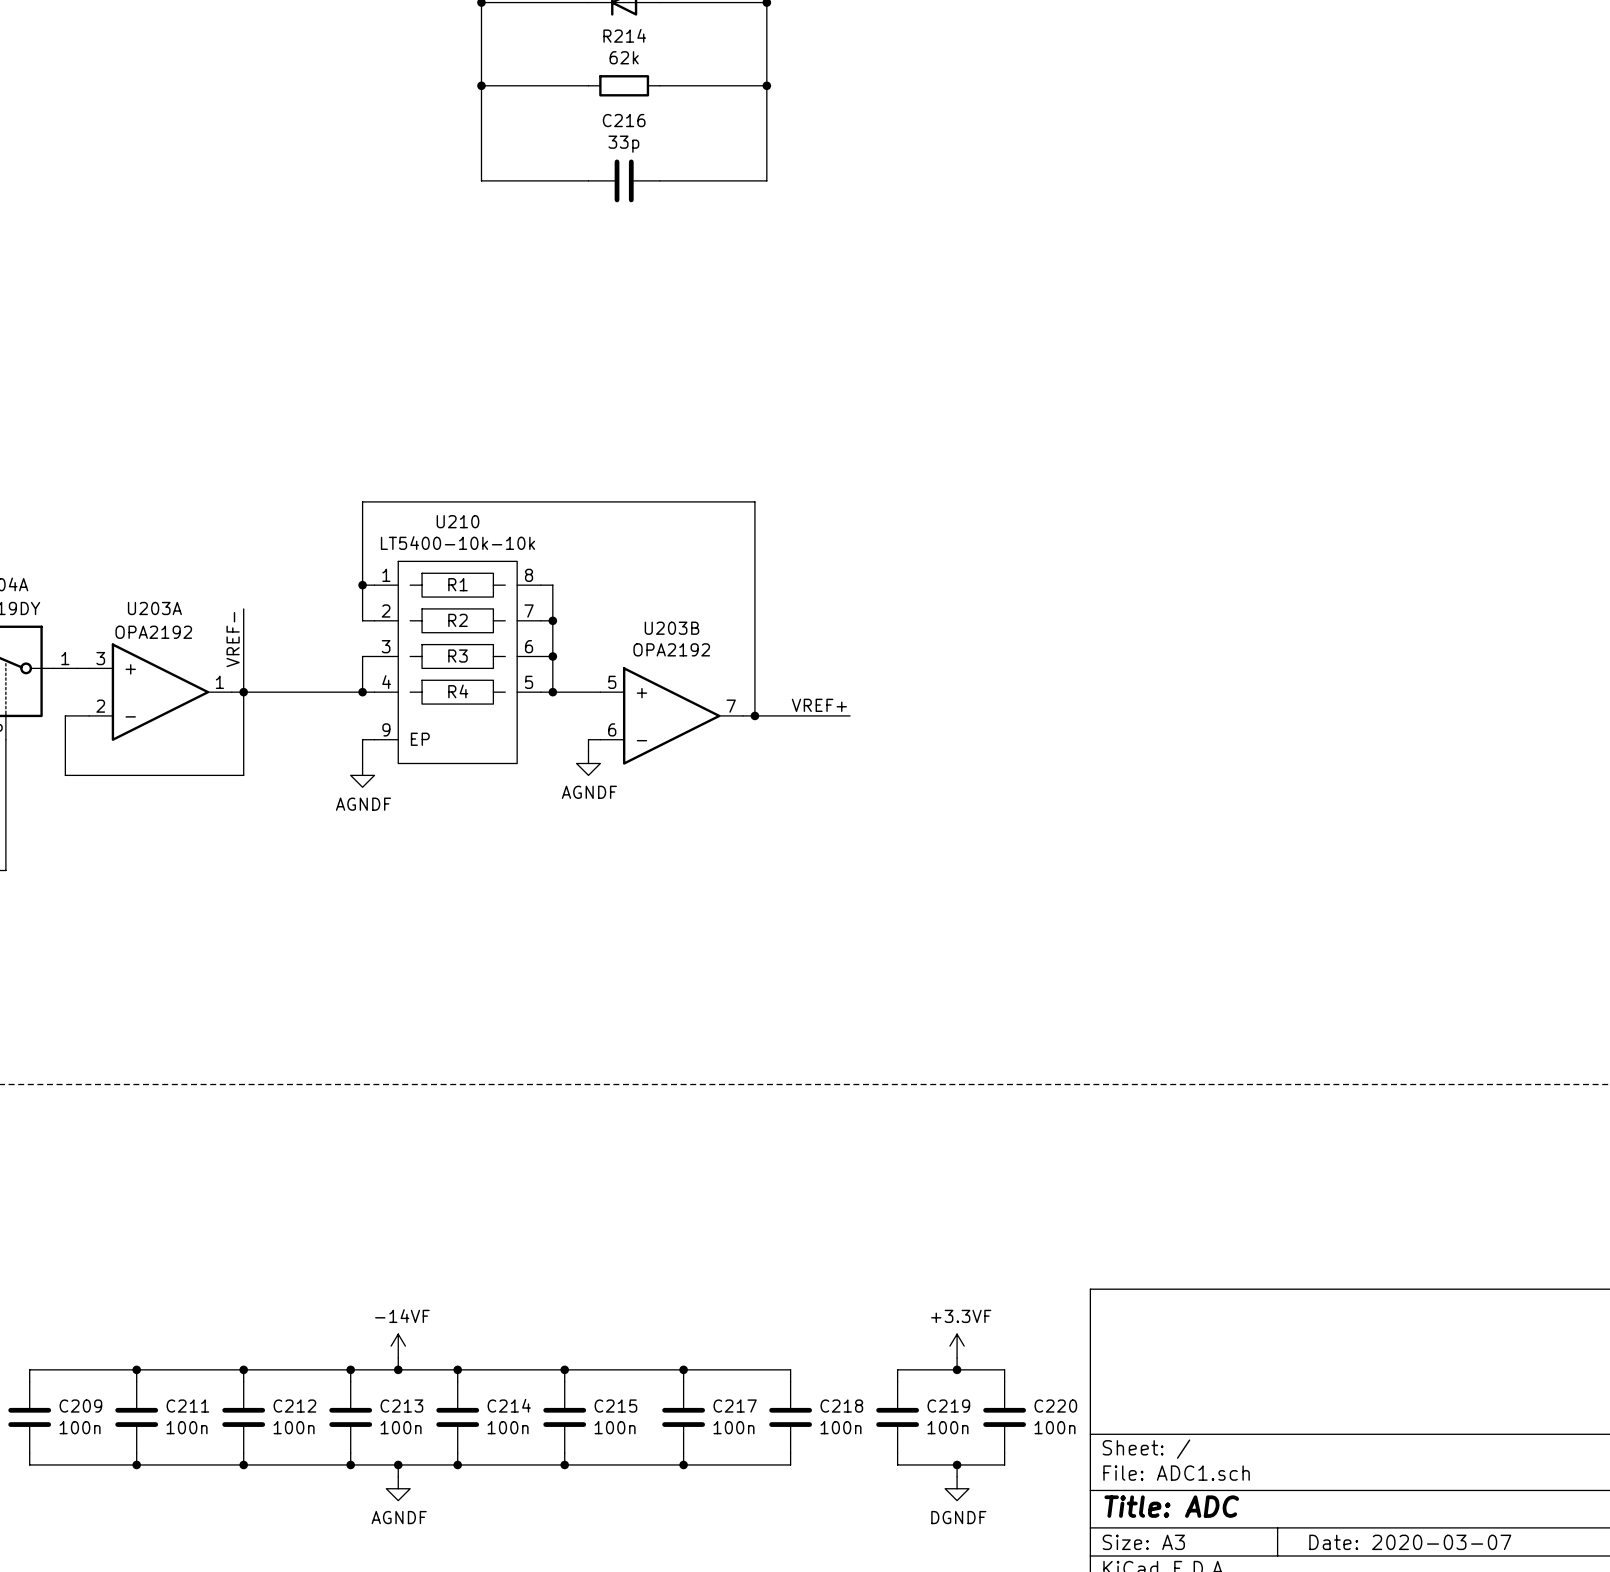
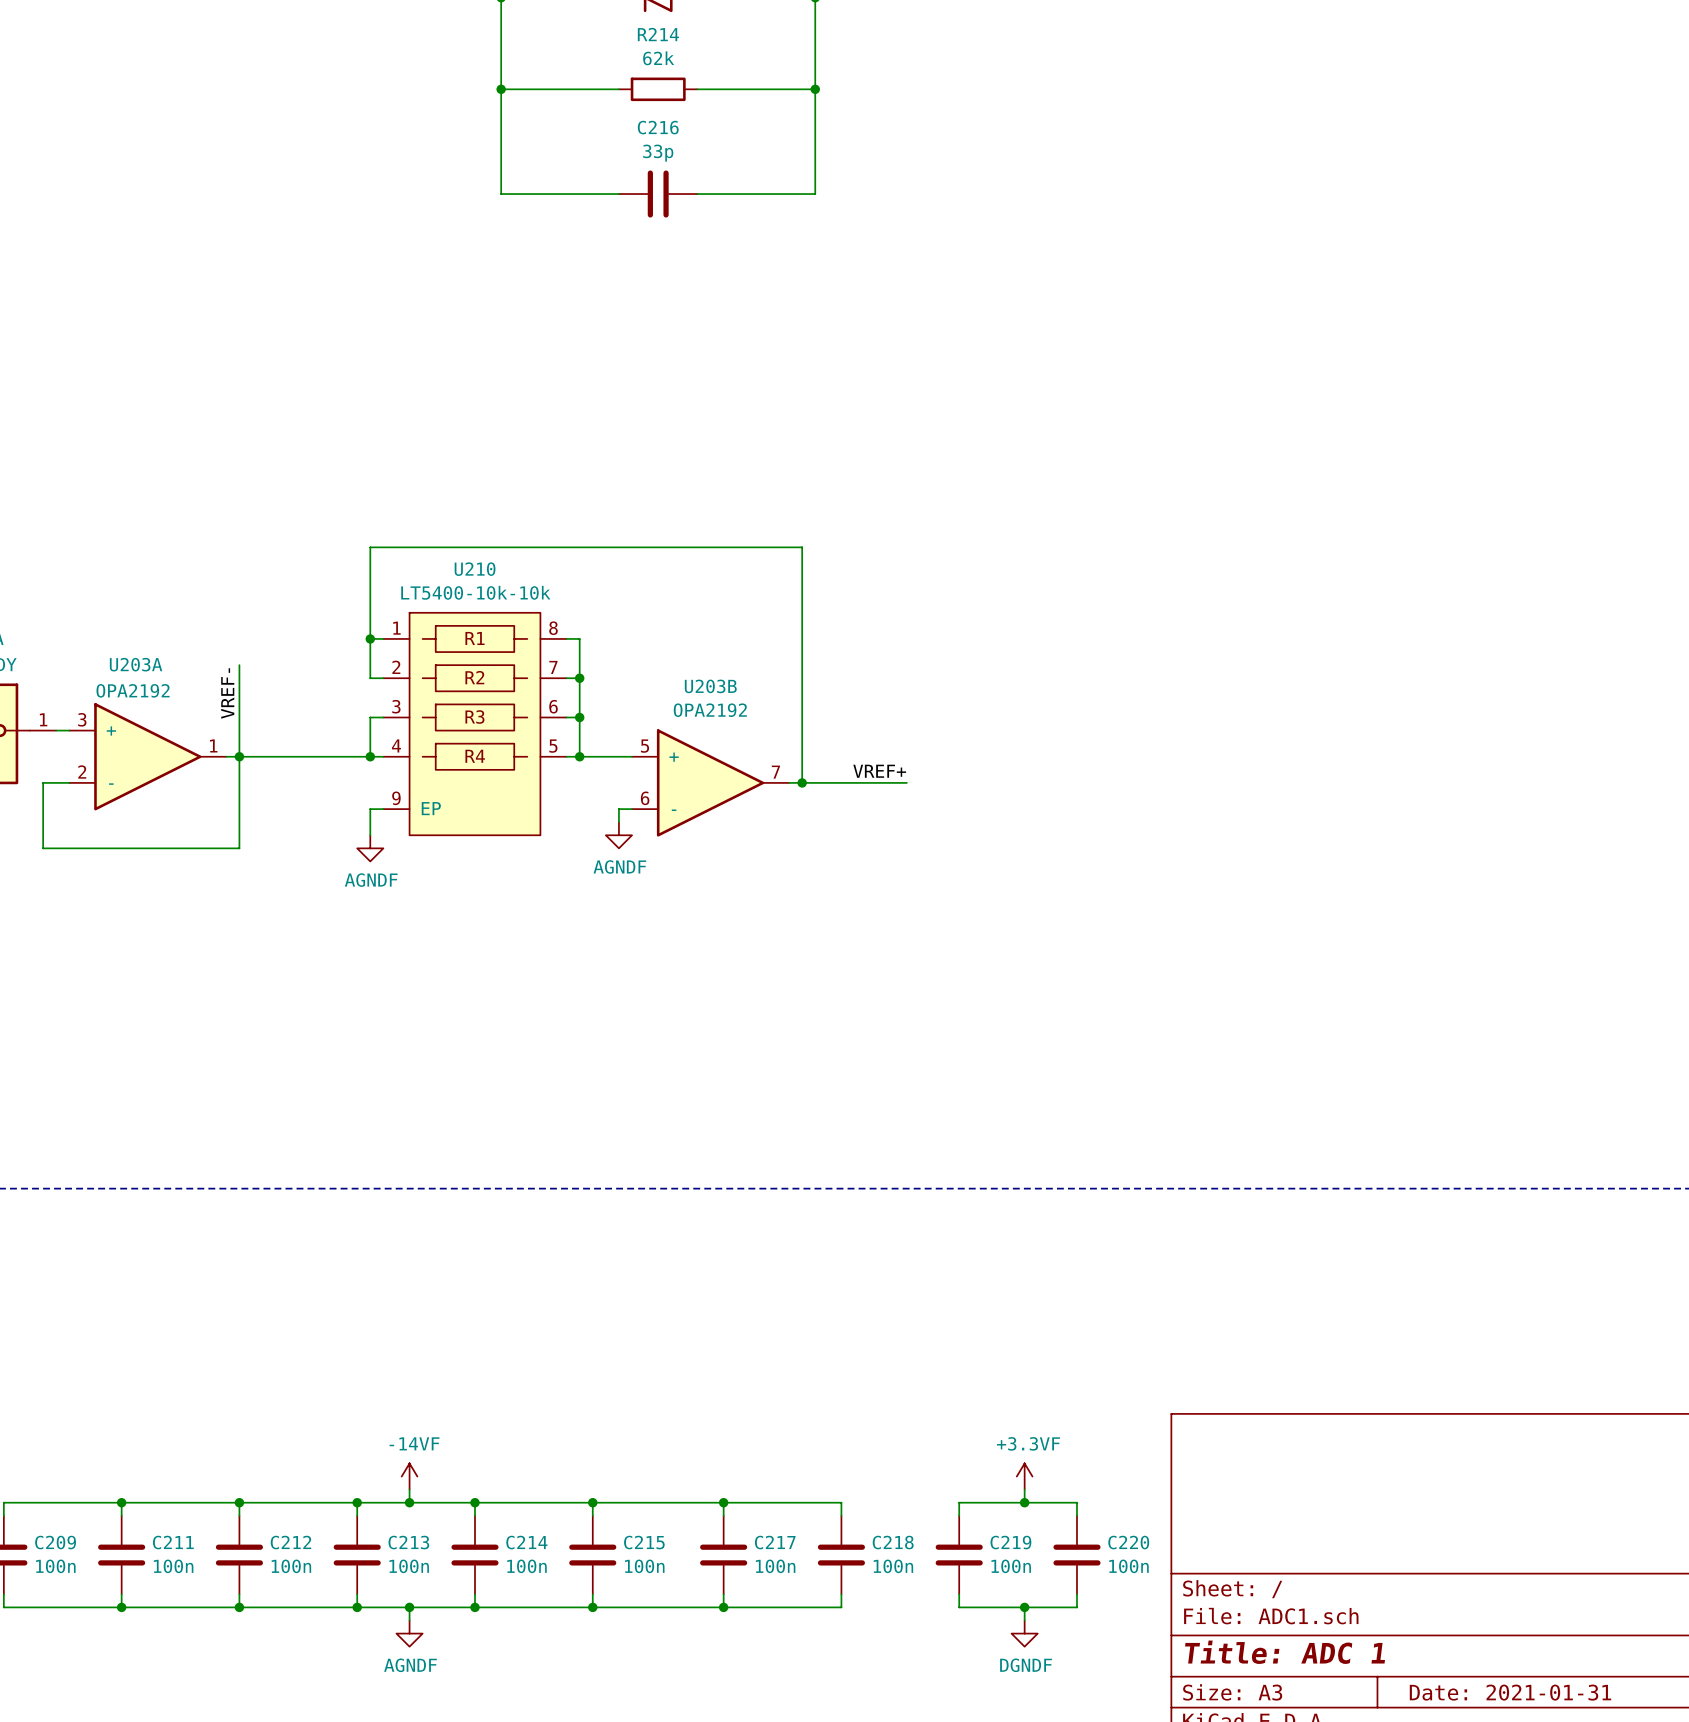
title block: Title: ADC (1171, 1506) -> Title: ADC 1 (1285, 1652)
title block: Date: 2020-03-07 (1410, 1542) -> Date: 2021-01-31 (1510, 1692)

